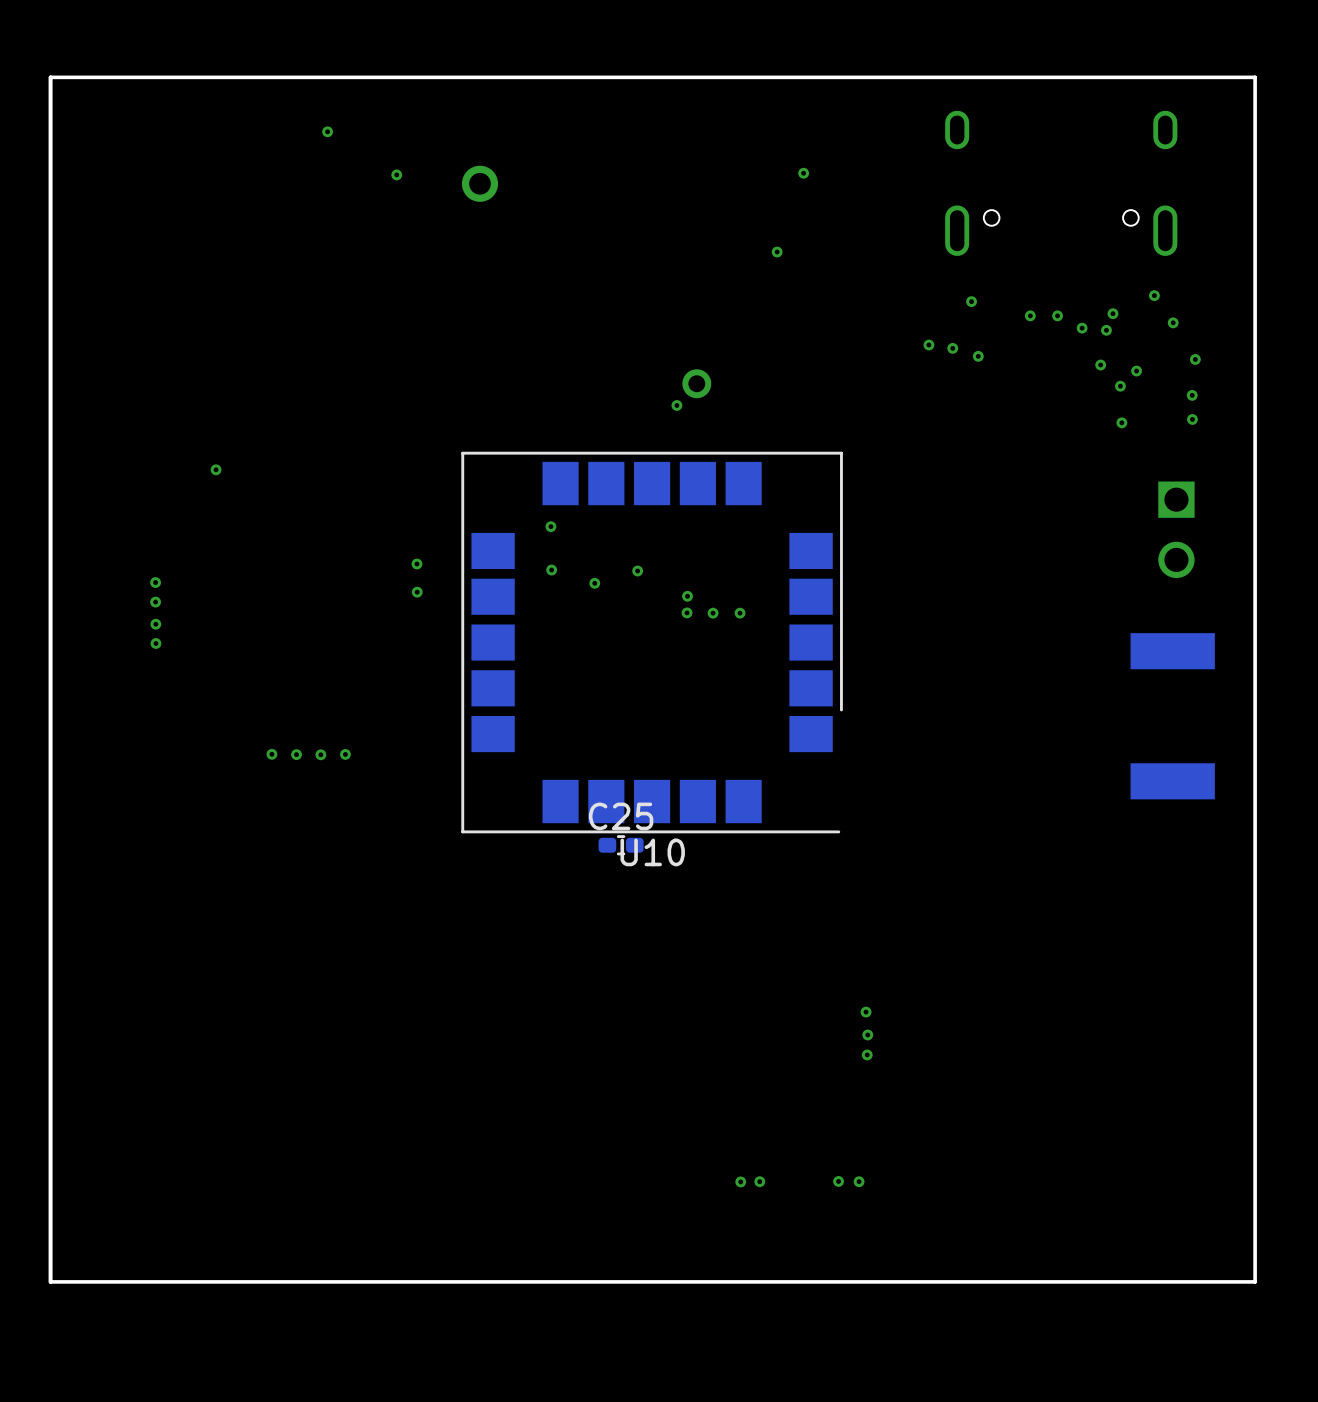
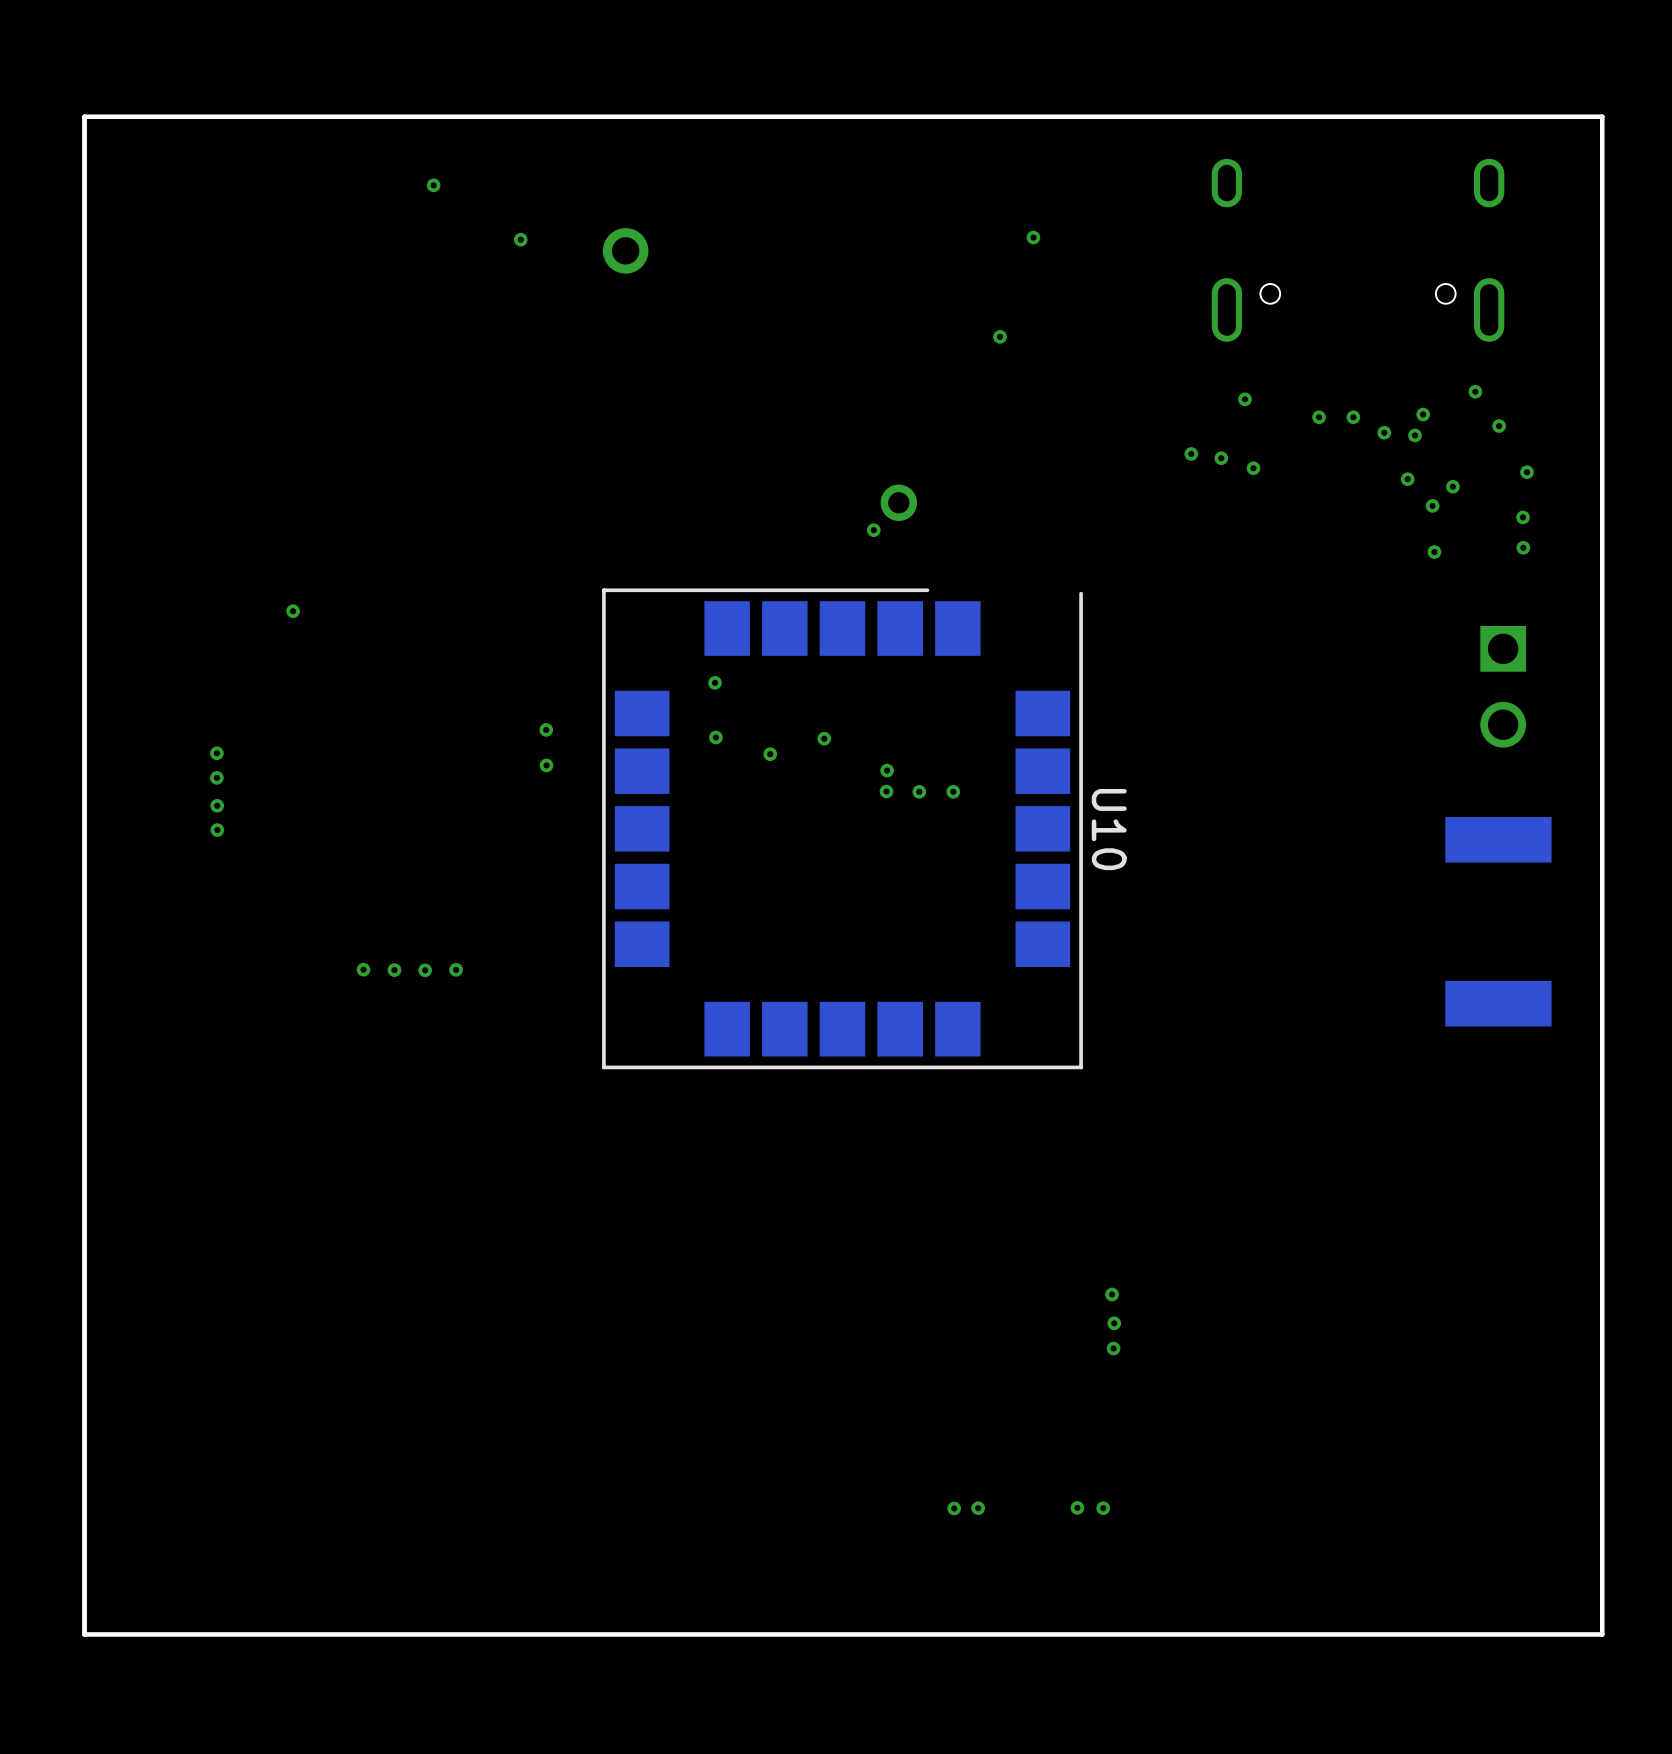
U10 rotation: 0° (652, 642) -> 90° counterclockwise (842, 828)
C25: (621, 845) -> none

